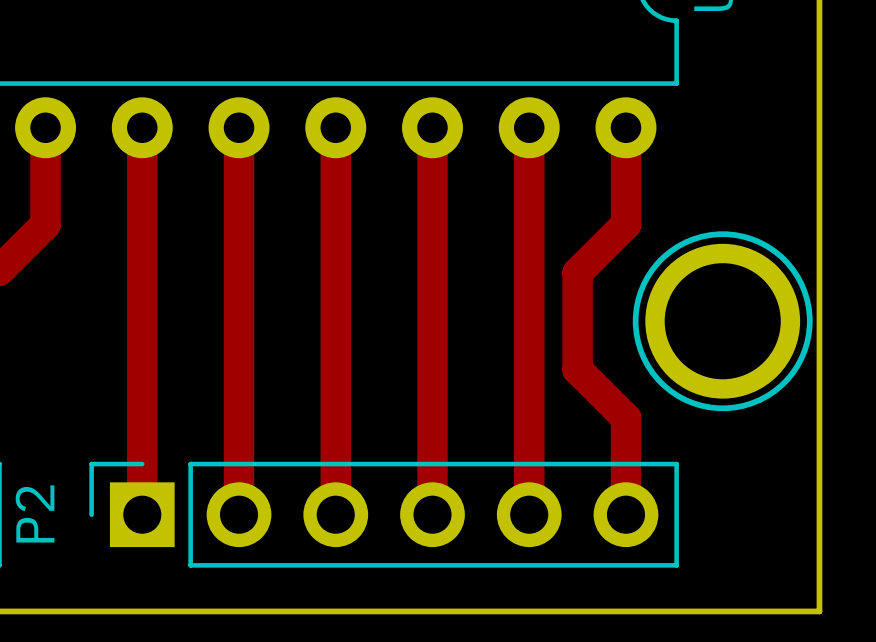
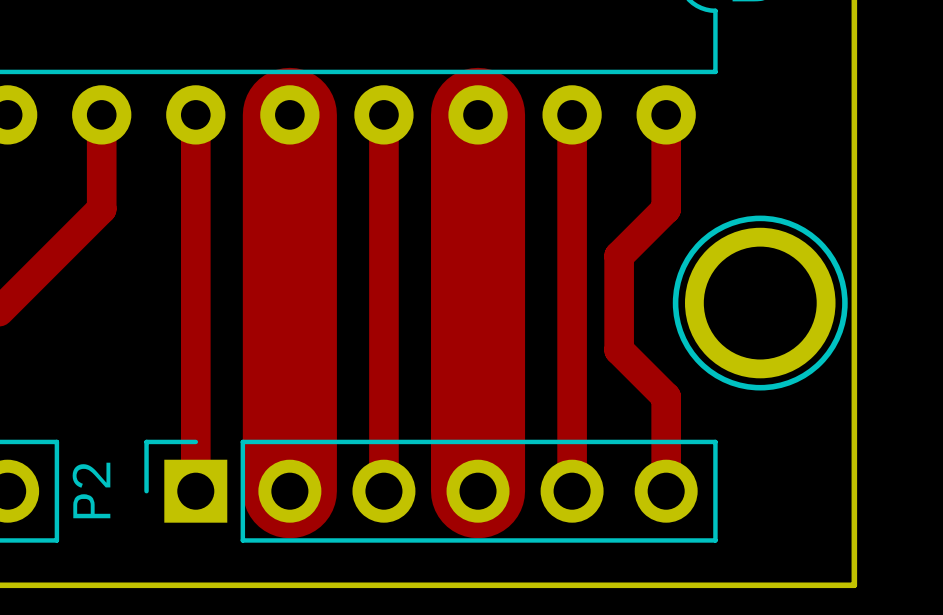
track width: thin (239, 127) (239, 514) -> thick (289, 114) (289, 491)
track width: thin (432, 127) (432, 514) -> thick (478, 114) (478, 491)

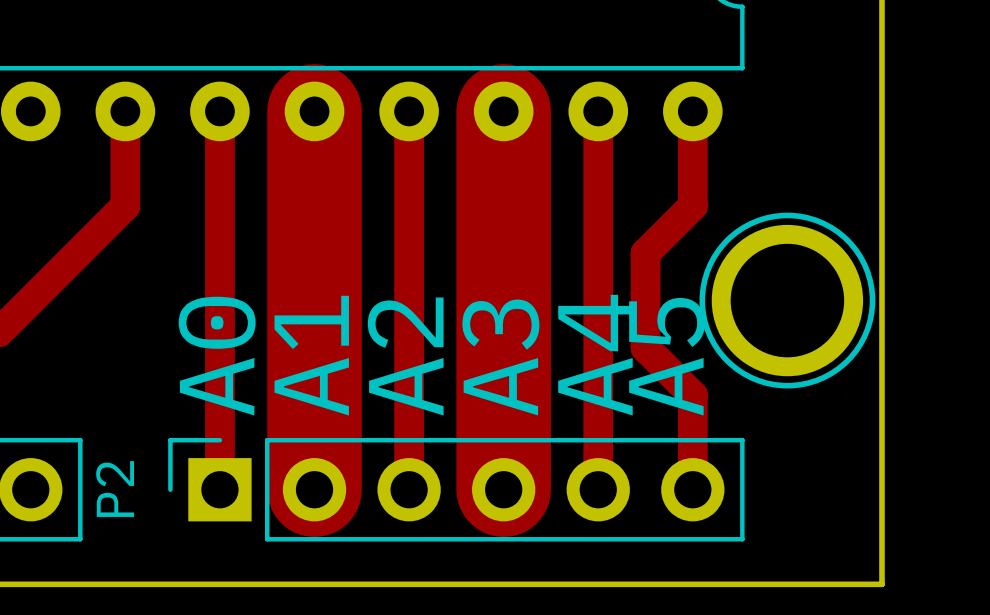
text: none -> A1 (311, 355)
text: none -> A4 (595, 355)
text: none -> A0 (217, 356)
text: none -> A2 (405, 356)
text: none -> A5 (667, 356)
text: none -> A3 (500, 357)

